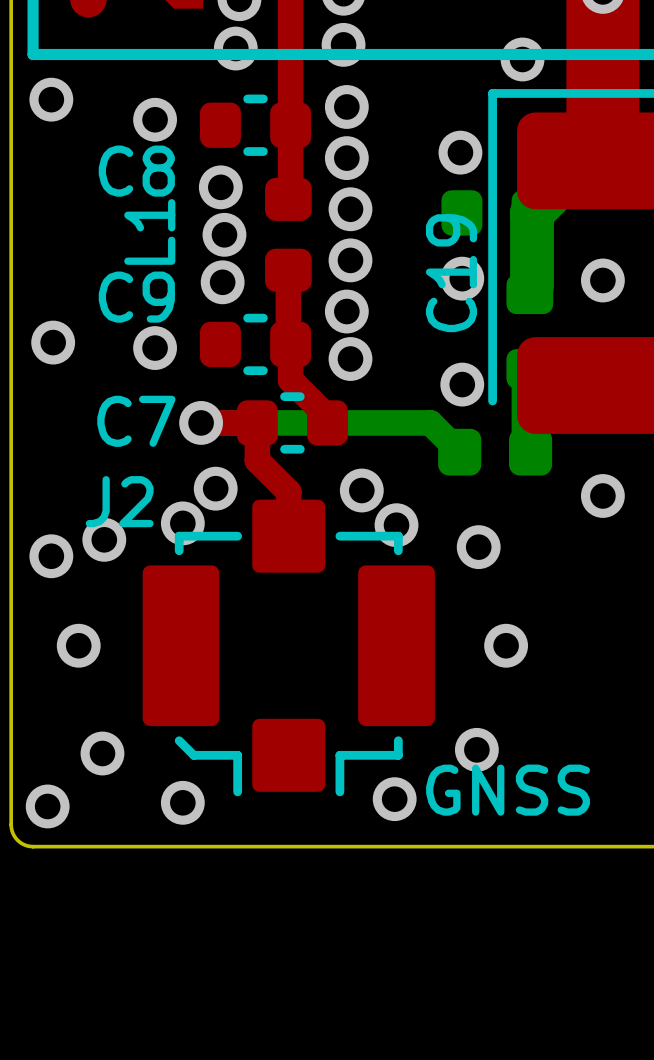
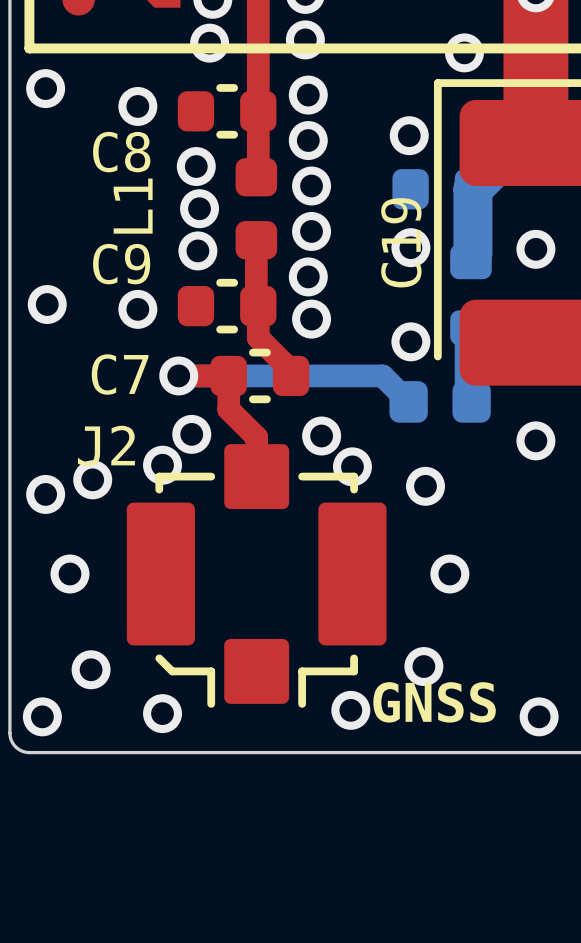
via: none -> (539, 716)

